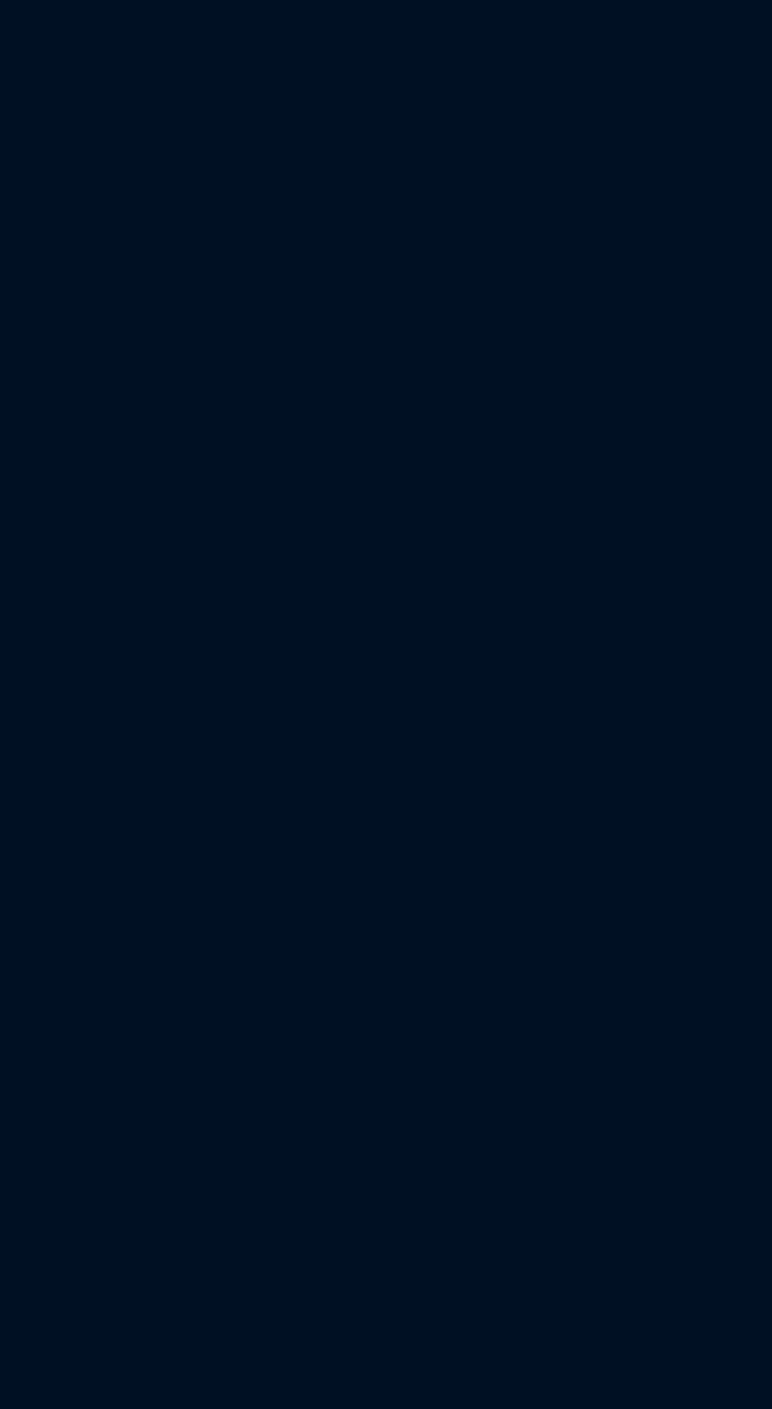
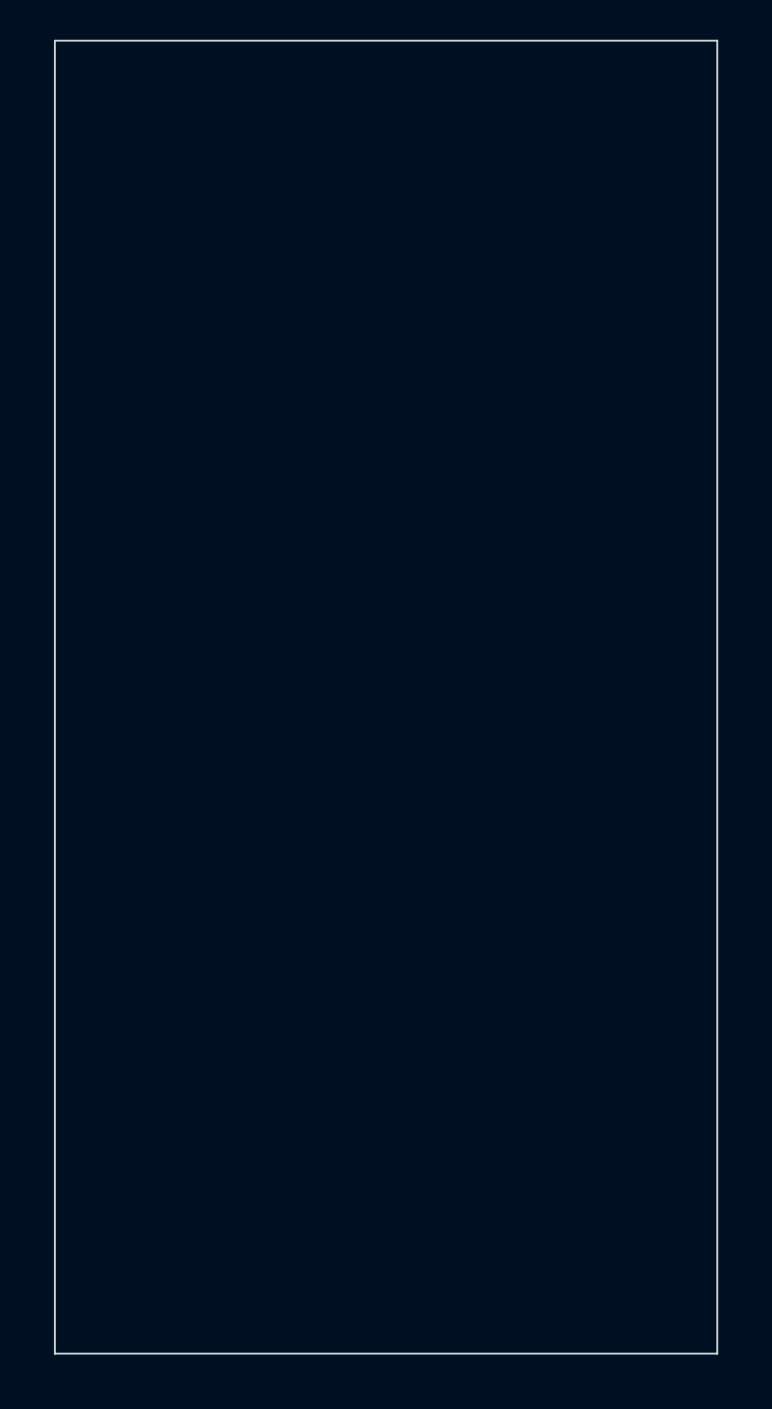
board edge: none -> (54, 40) (717, 40) (717, 1353) (54, 1353) (54, 40)

